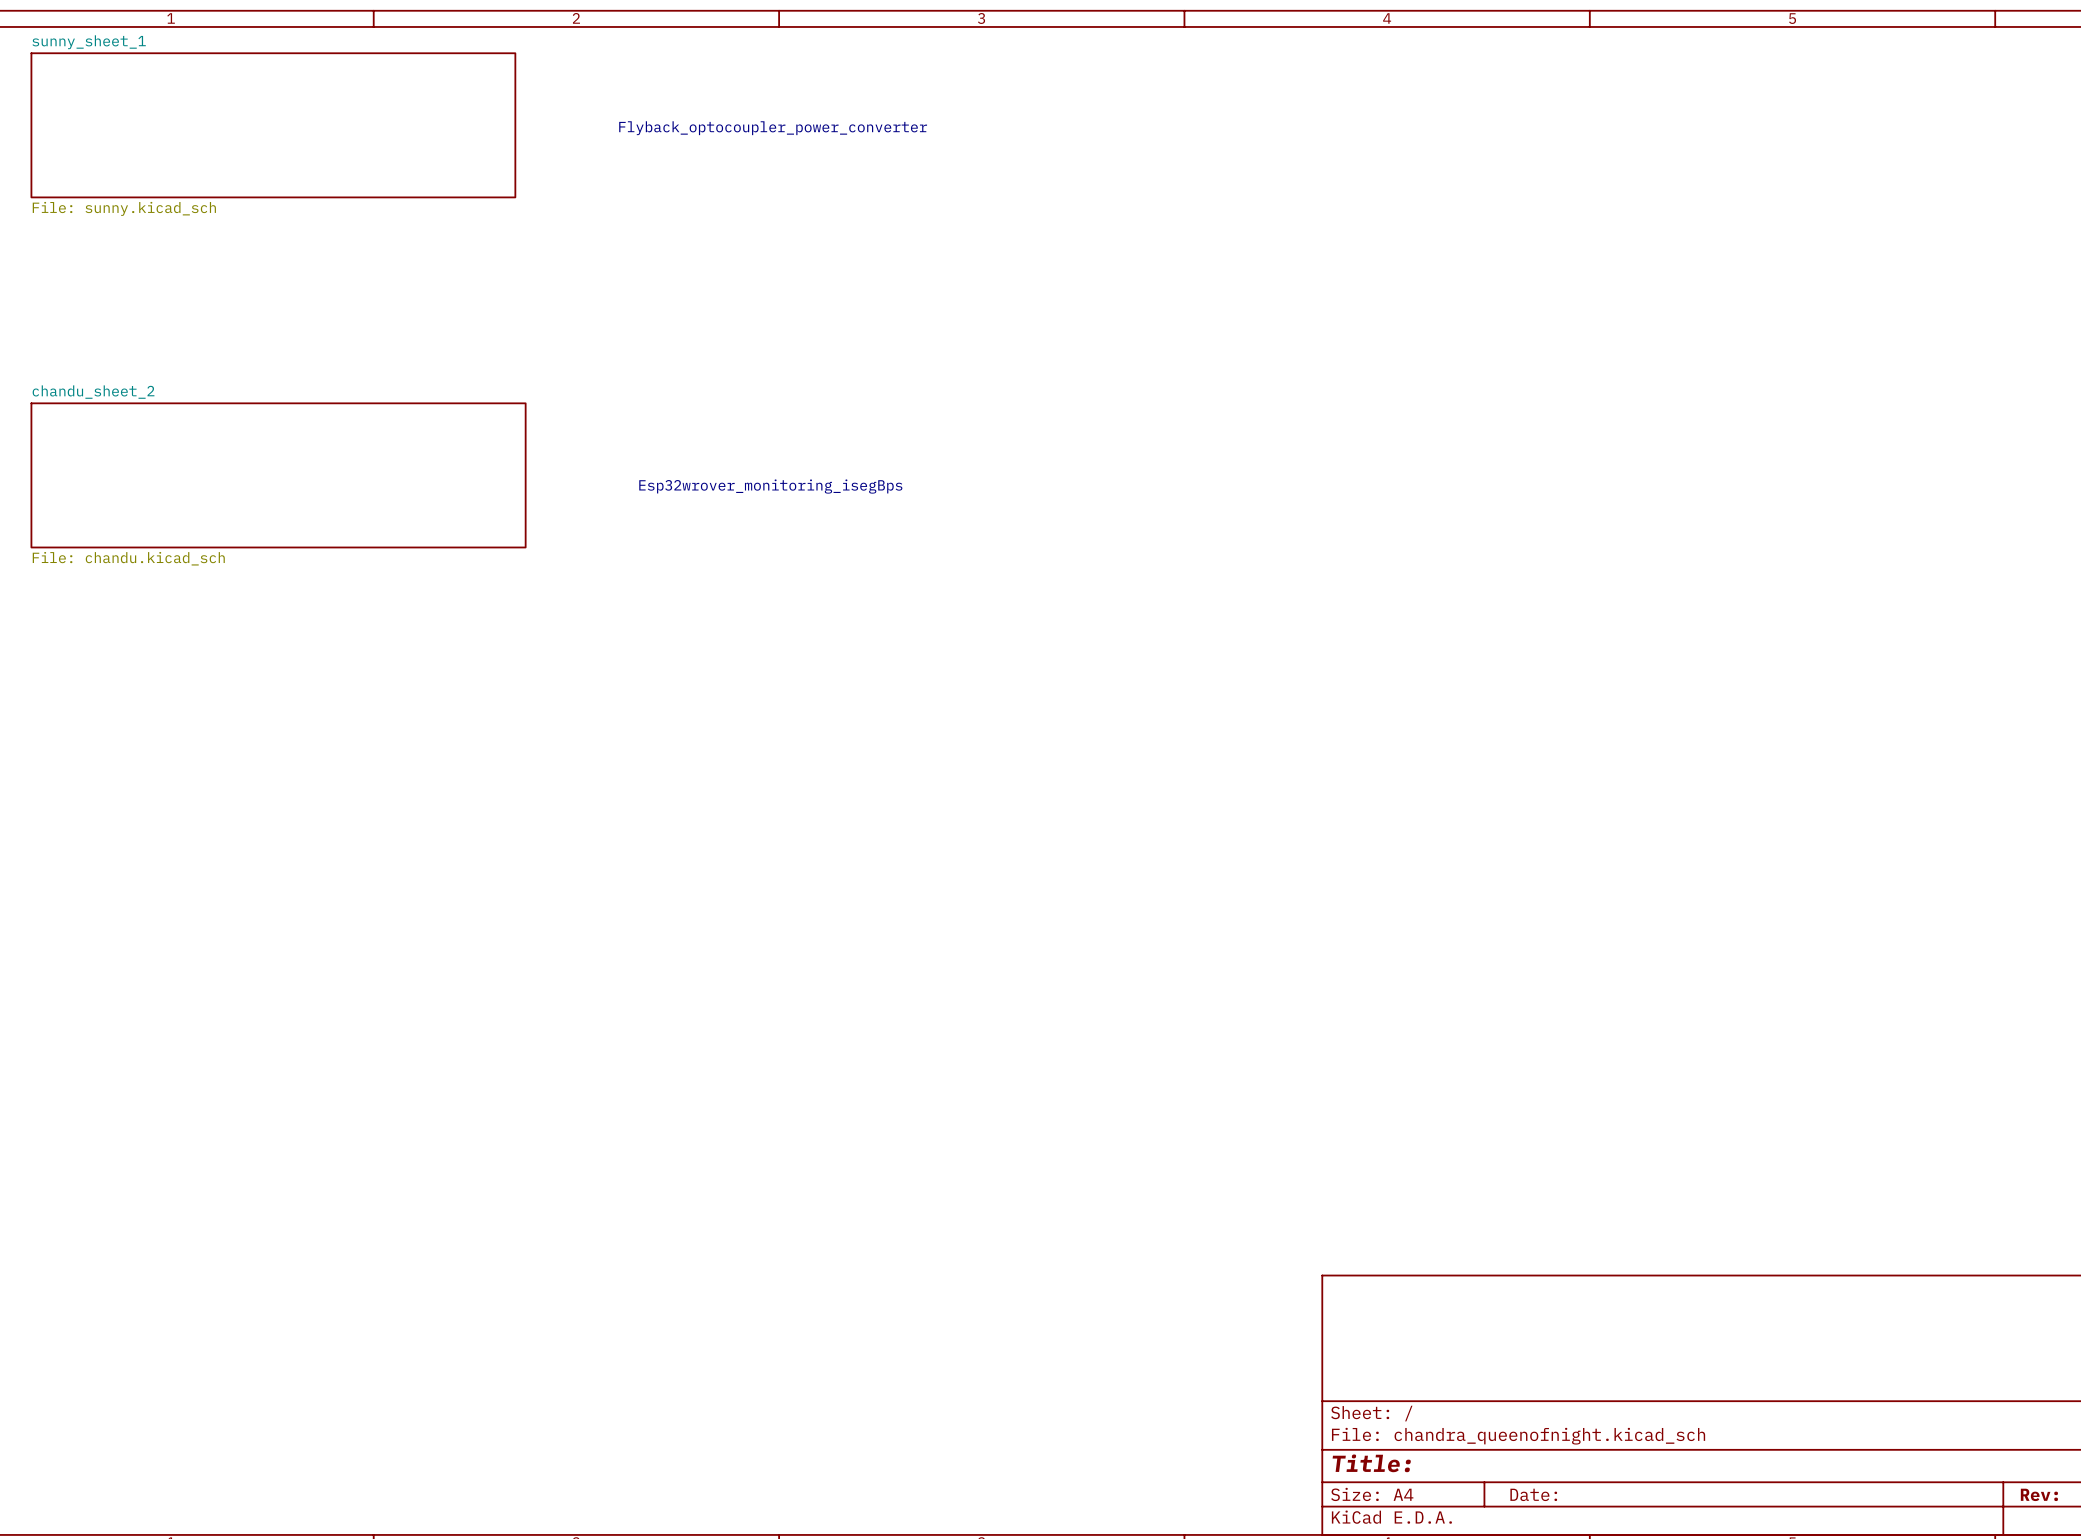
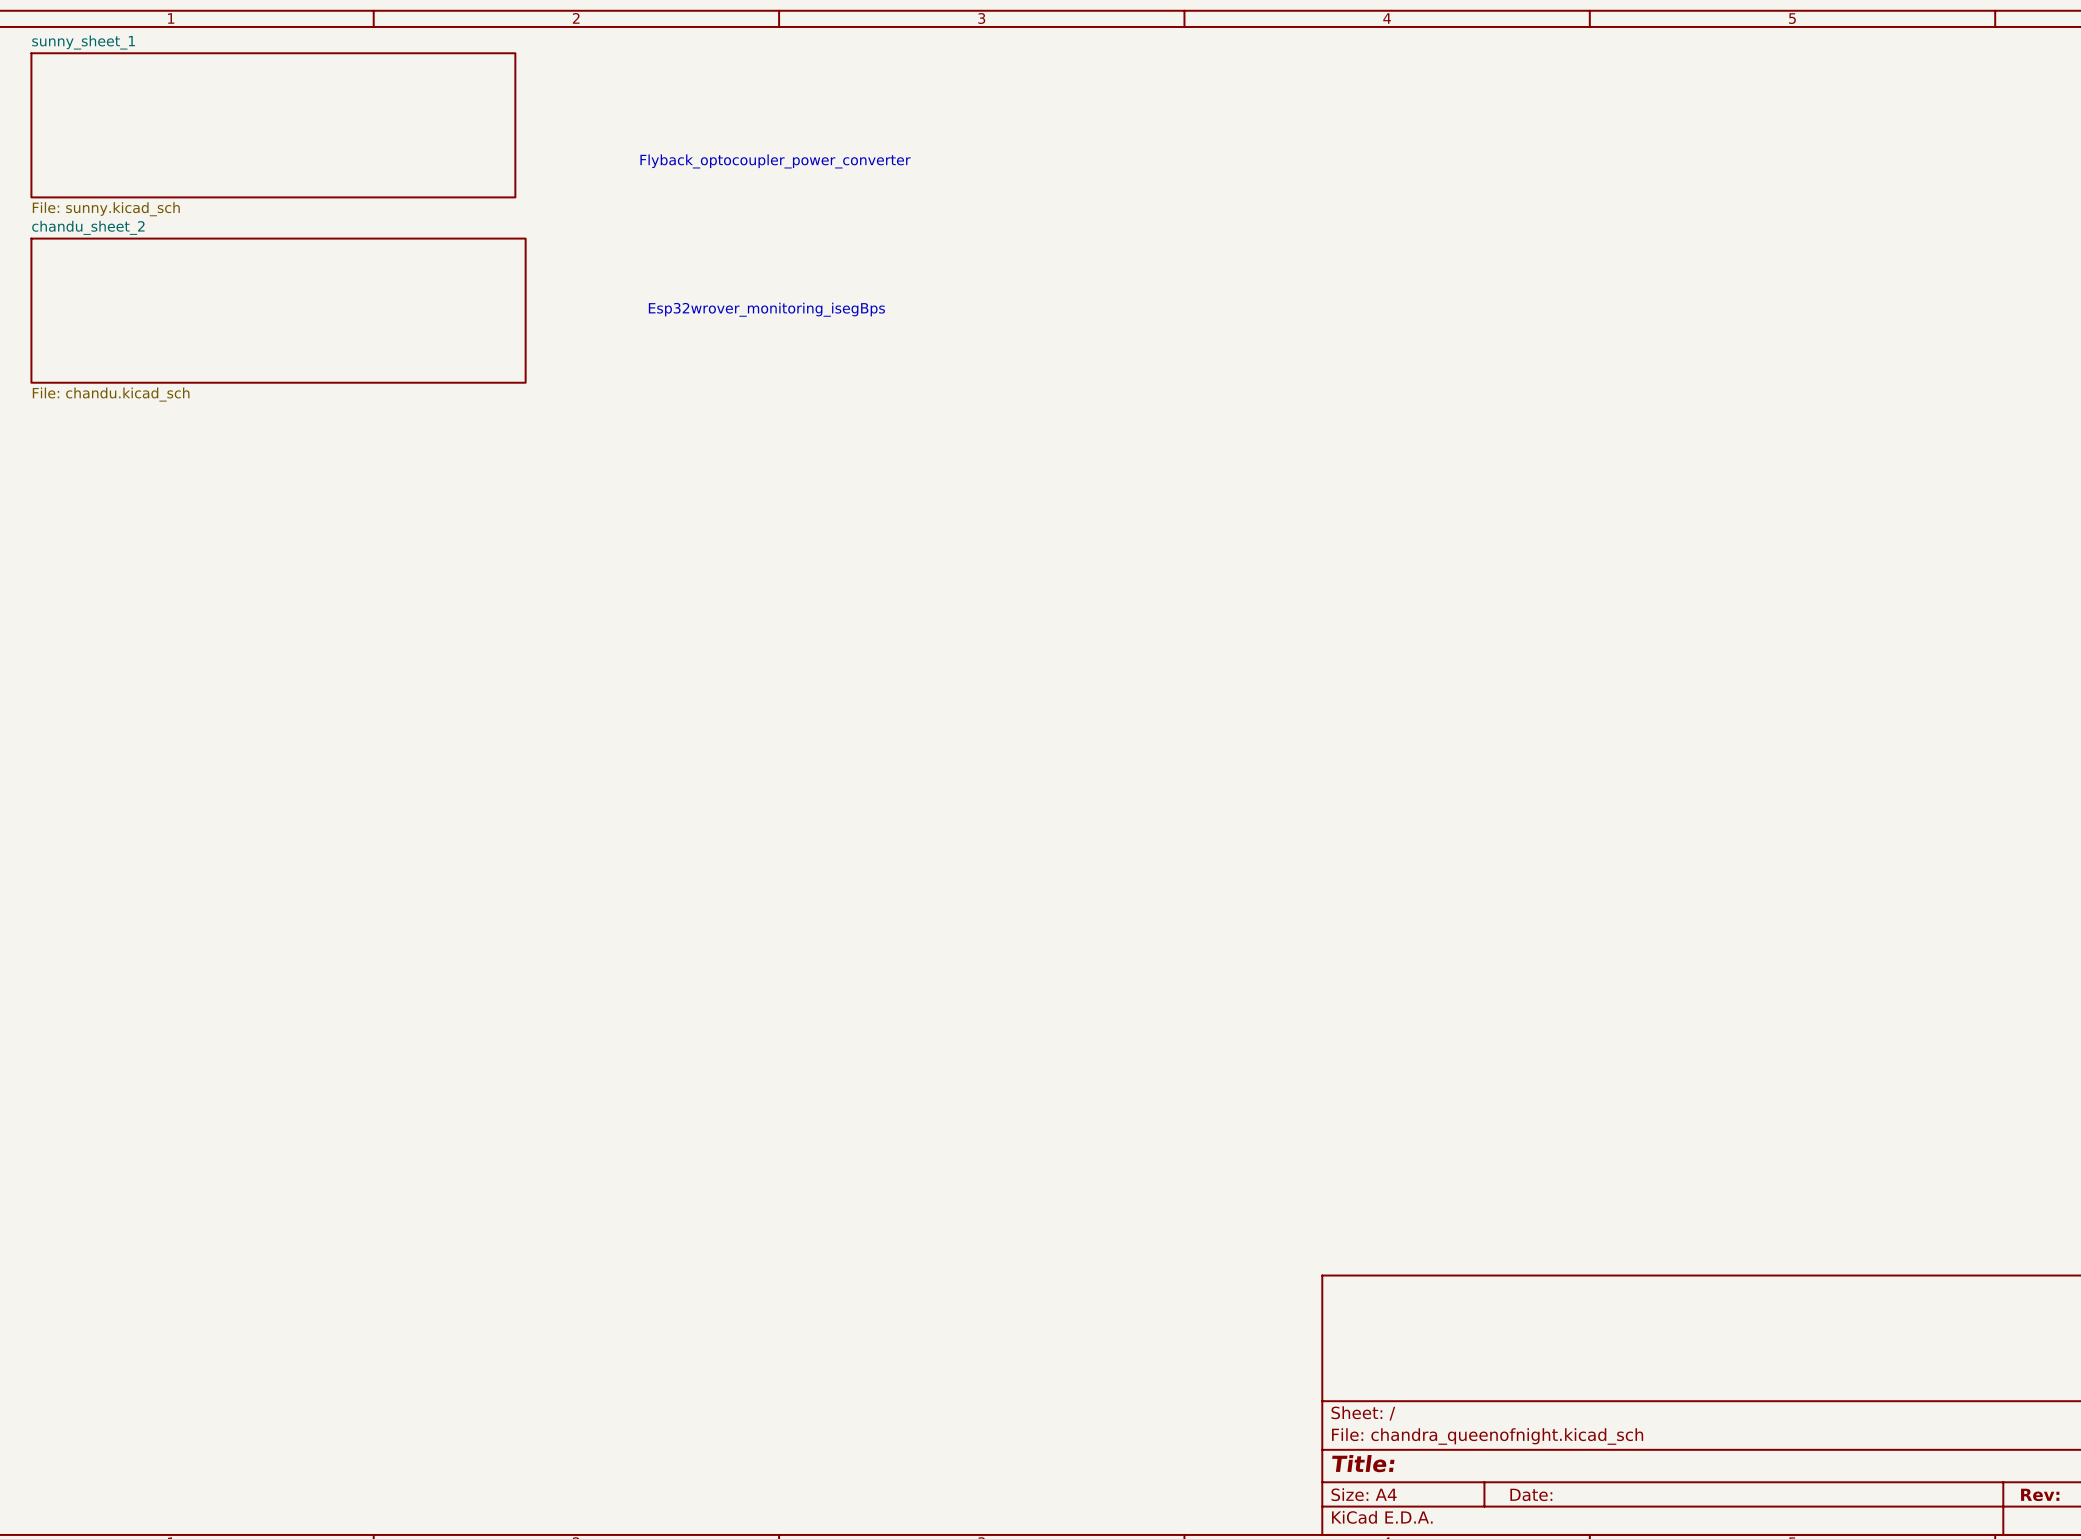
text position: Flyback_optocoupler_power_converter (773, 128) -> Flyback_optocoupler_power_converter (775, 161)
sheet chandu_sheet_2 position: (278, 475) -> (278, 310)
text position: Esp32wrover_monitoring_isegBps (770, 486) -> Esp32wrover_monitoring_isegBps (766, 309)

